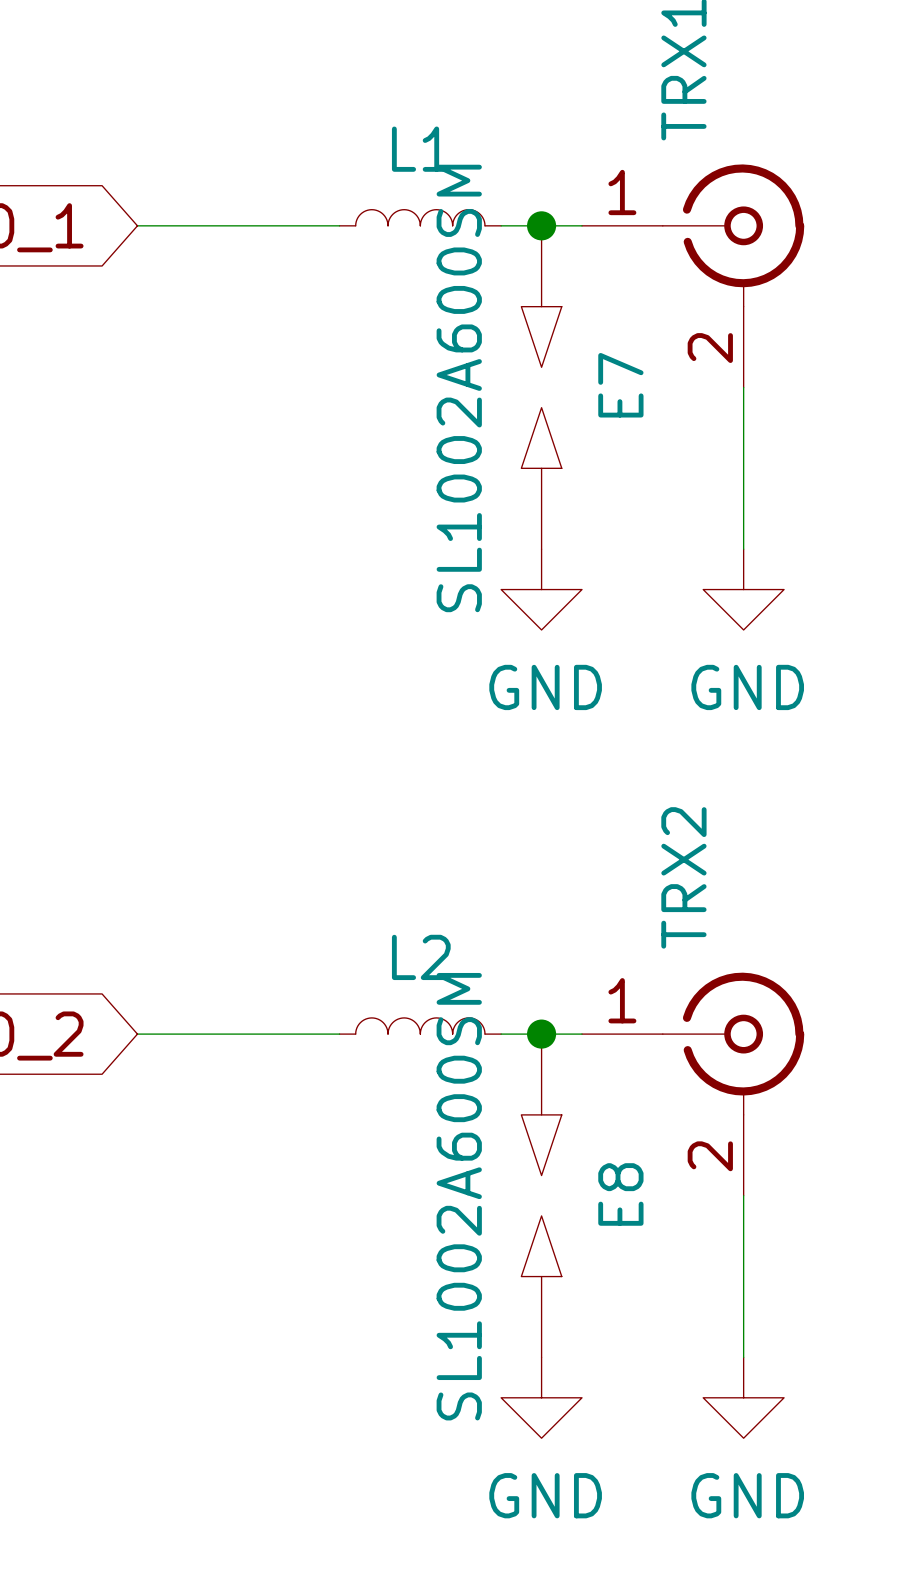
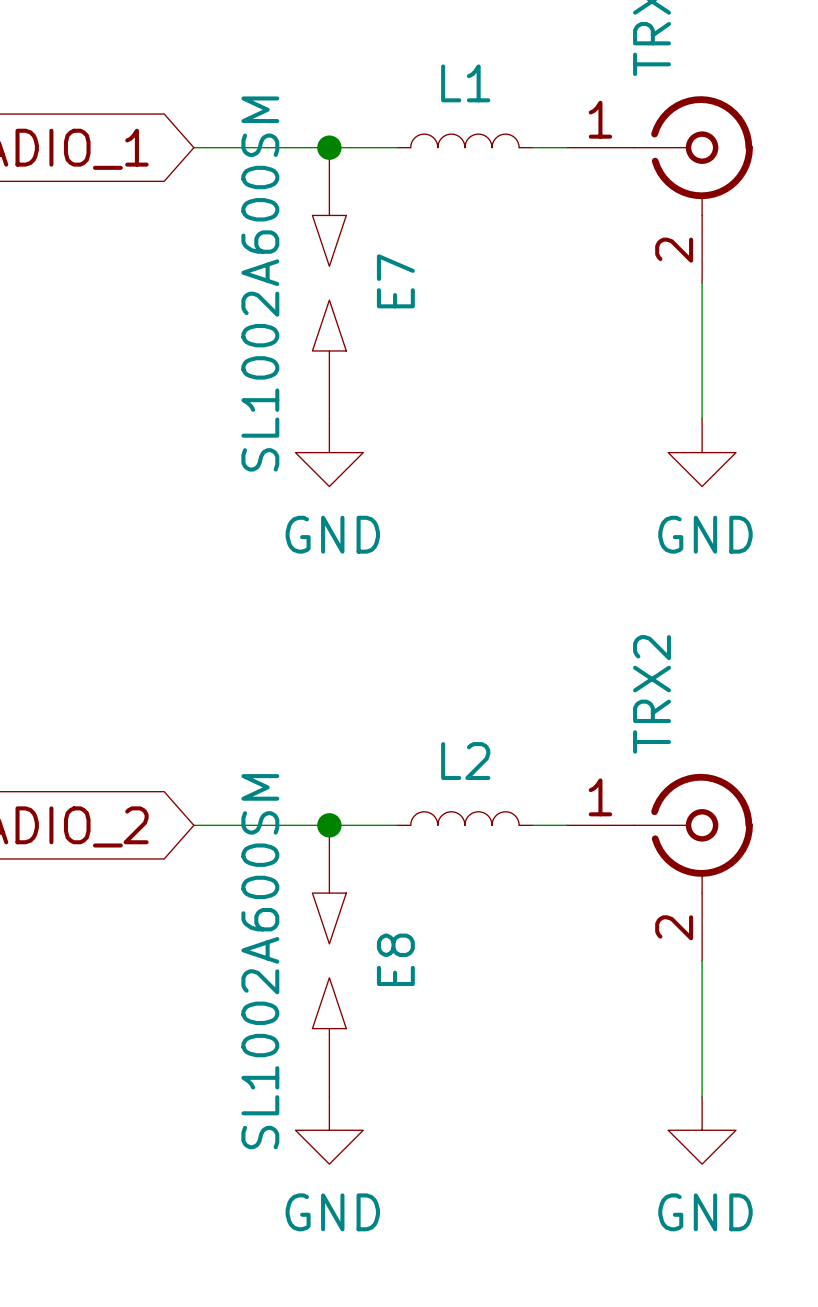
L1 position: (420, 217) -> (464, 140)
junction: none -> (329, 147)
wire: (501, 225) (541, 225) -> (363, 147) (397, 147)
junction: (541, 225) -> none
E7 position: (541, 387) -> (329, 283)
power symbol position: GND (541, 589) -> GND (329, 452)
L2 position: (420, 1026) -> (464, 818)
junction: none -> (329, 825)
wire: (501, 1034) (541, 1034) -> (363, 825) (397, 825)
junction: (541, 1034) -> none
E8 position: (541, 1195) -> (329, 960)
power symbol position: GND (541, 1397) -> GND (329, 1130)

